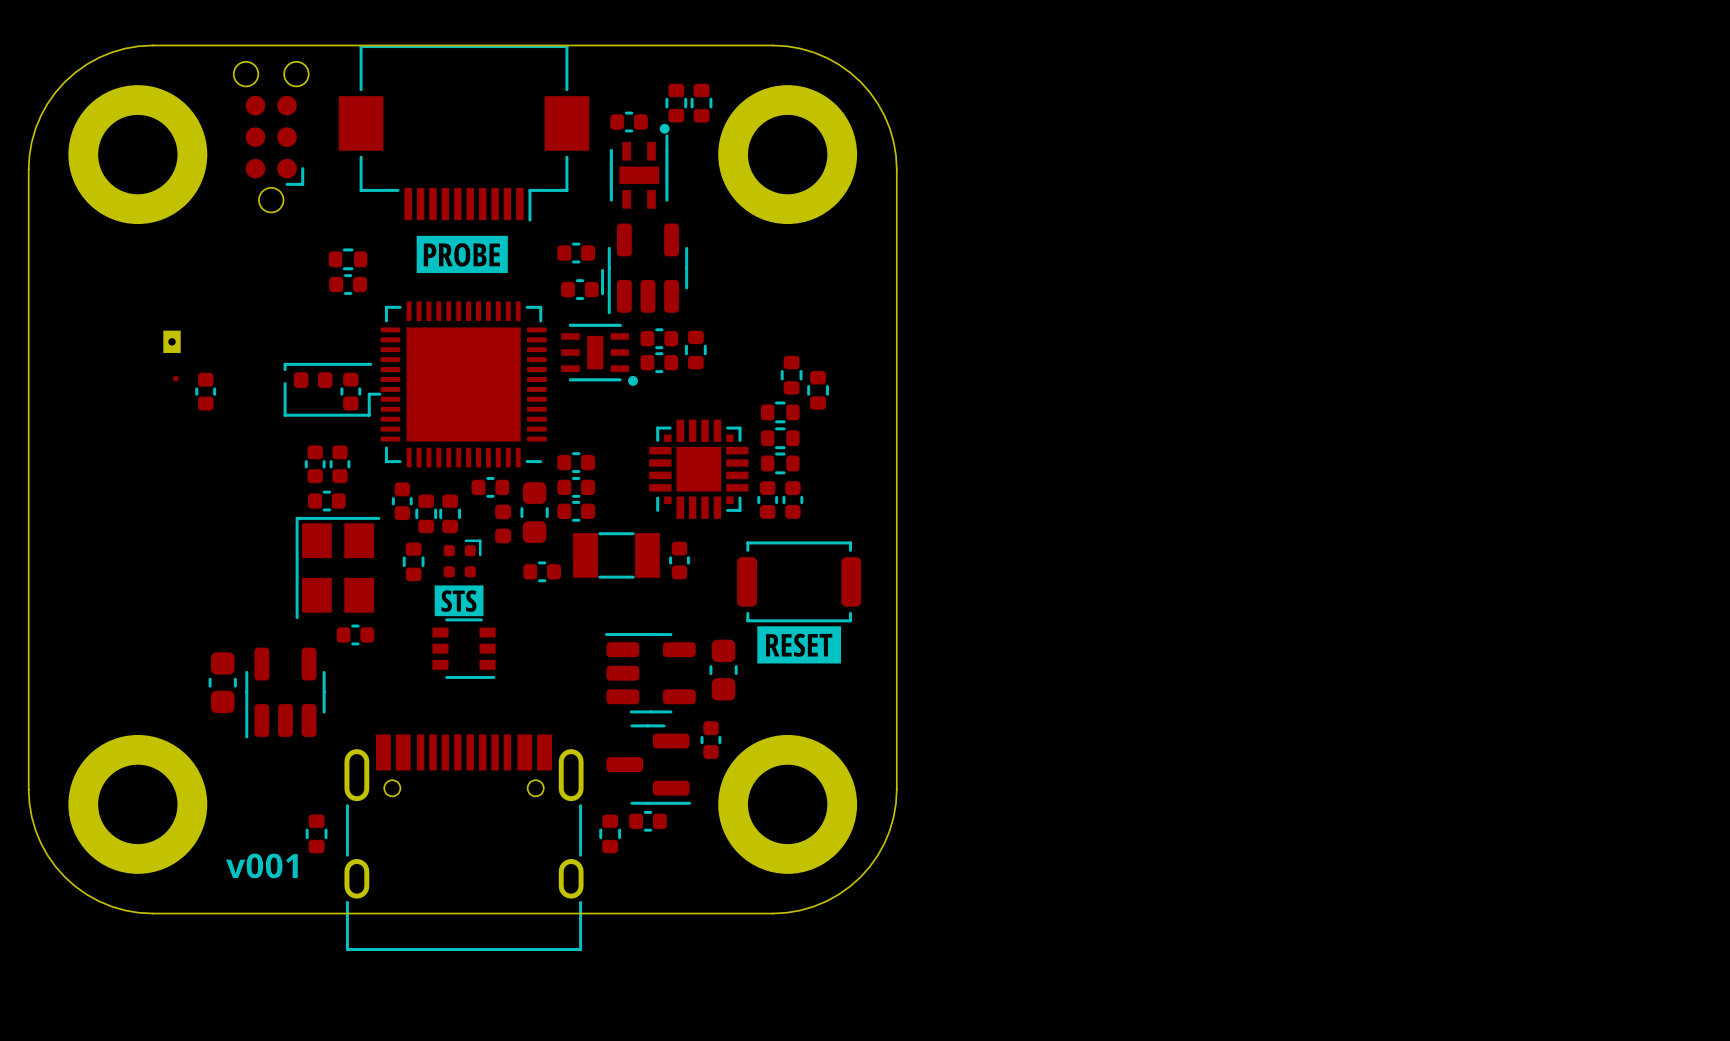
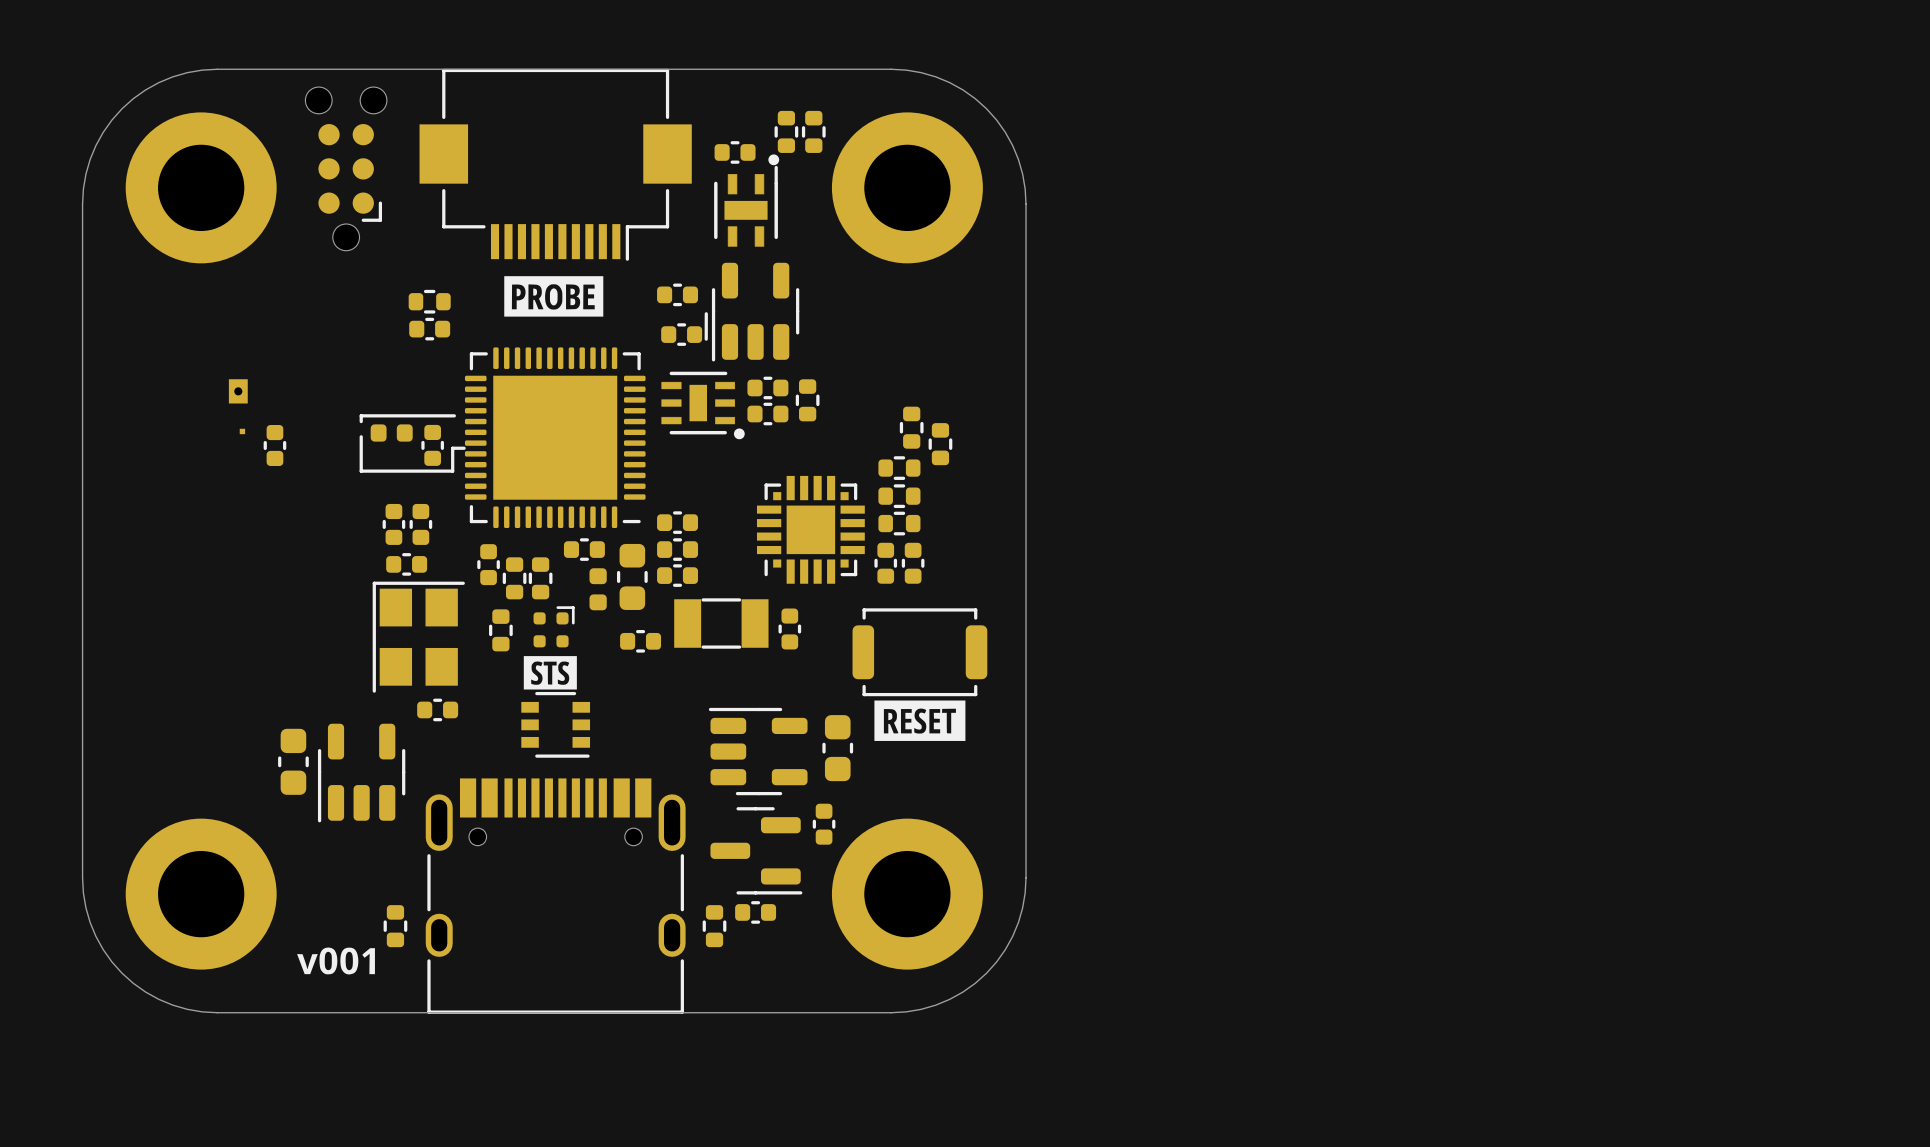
part position: (464, 842) -> (555, 896)

